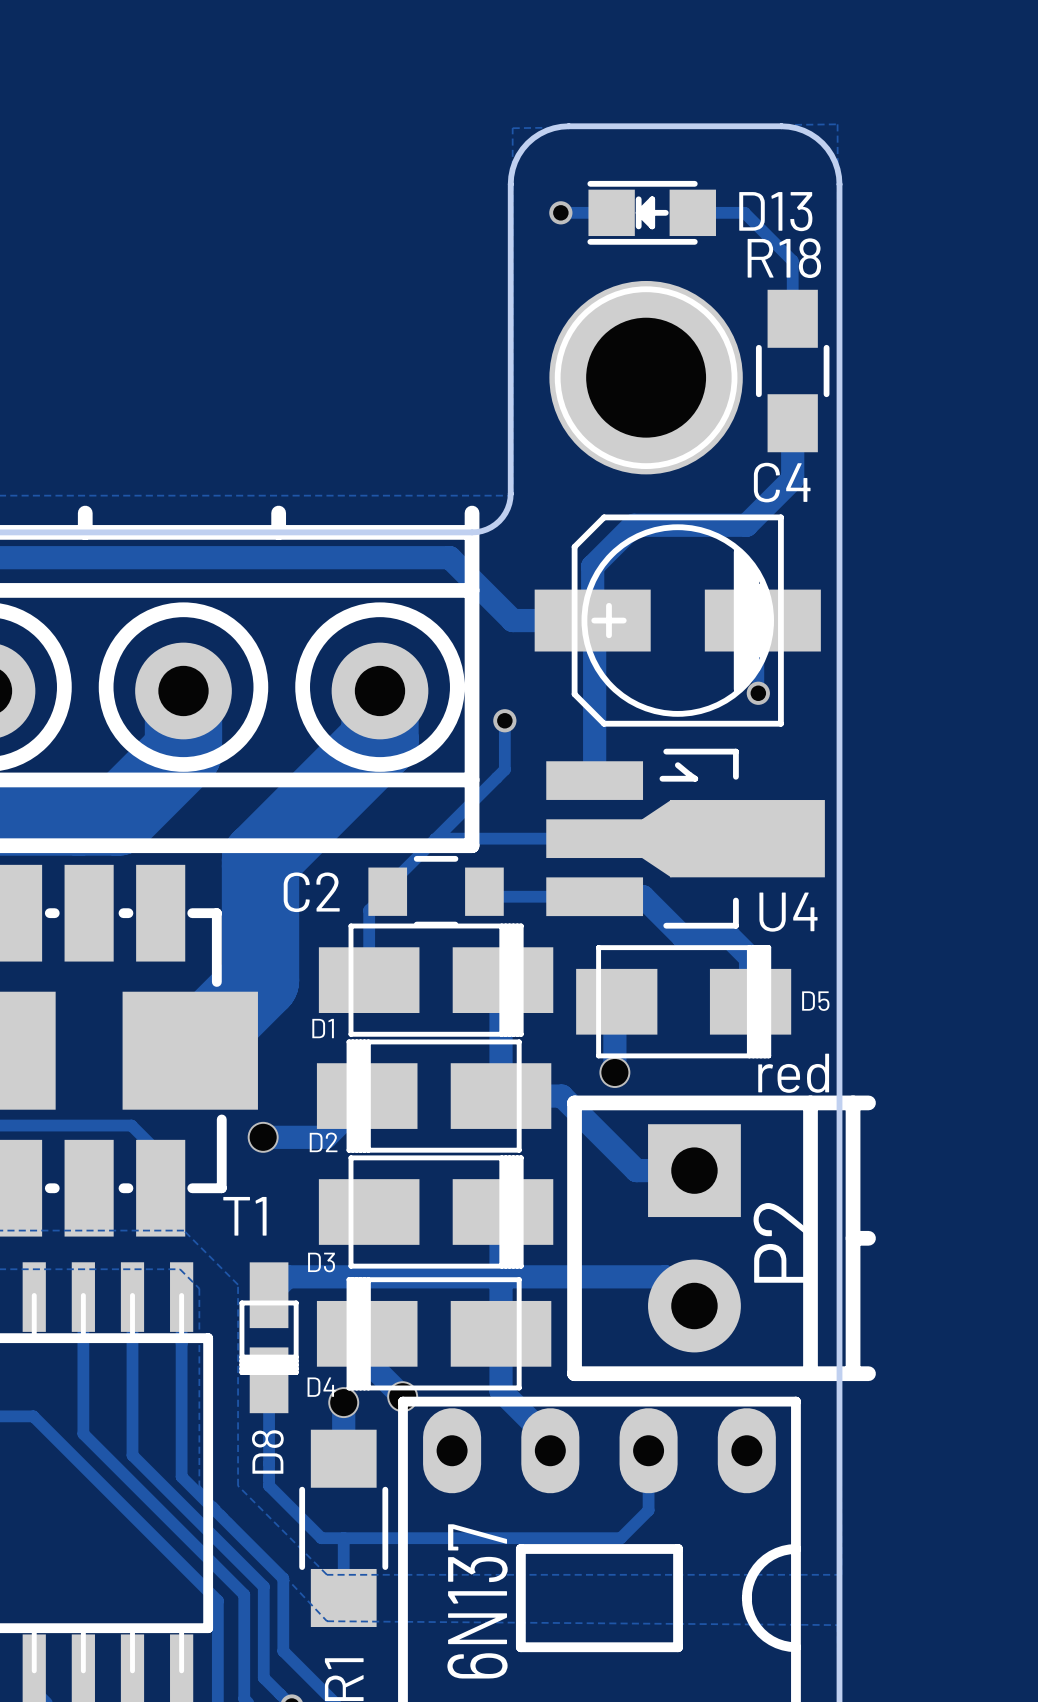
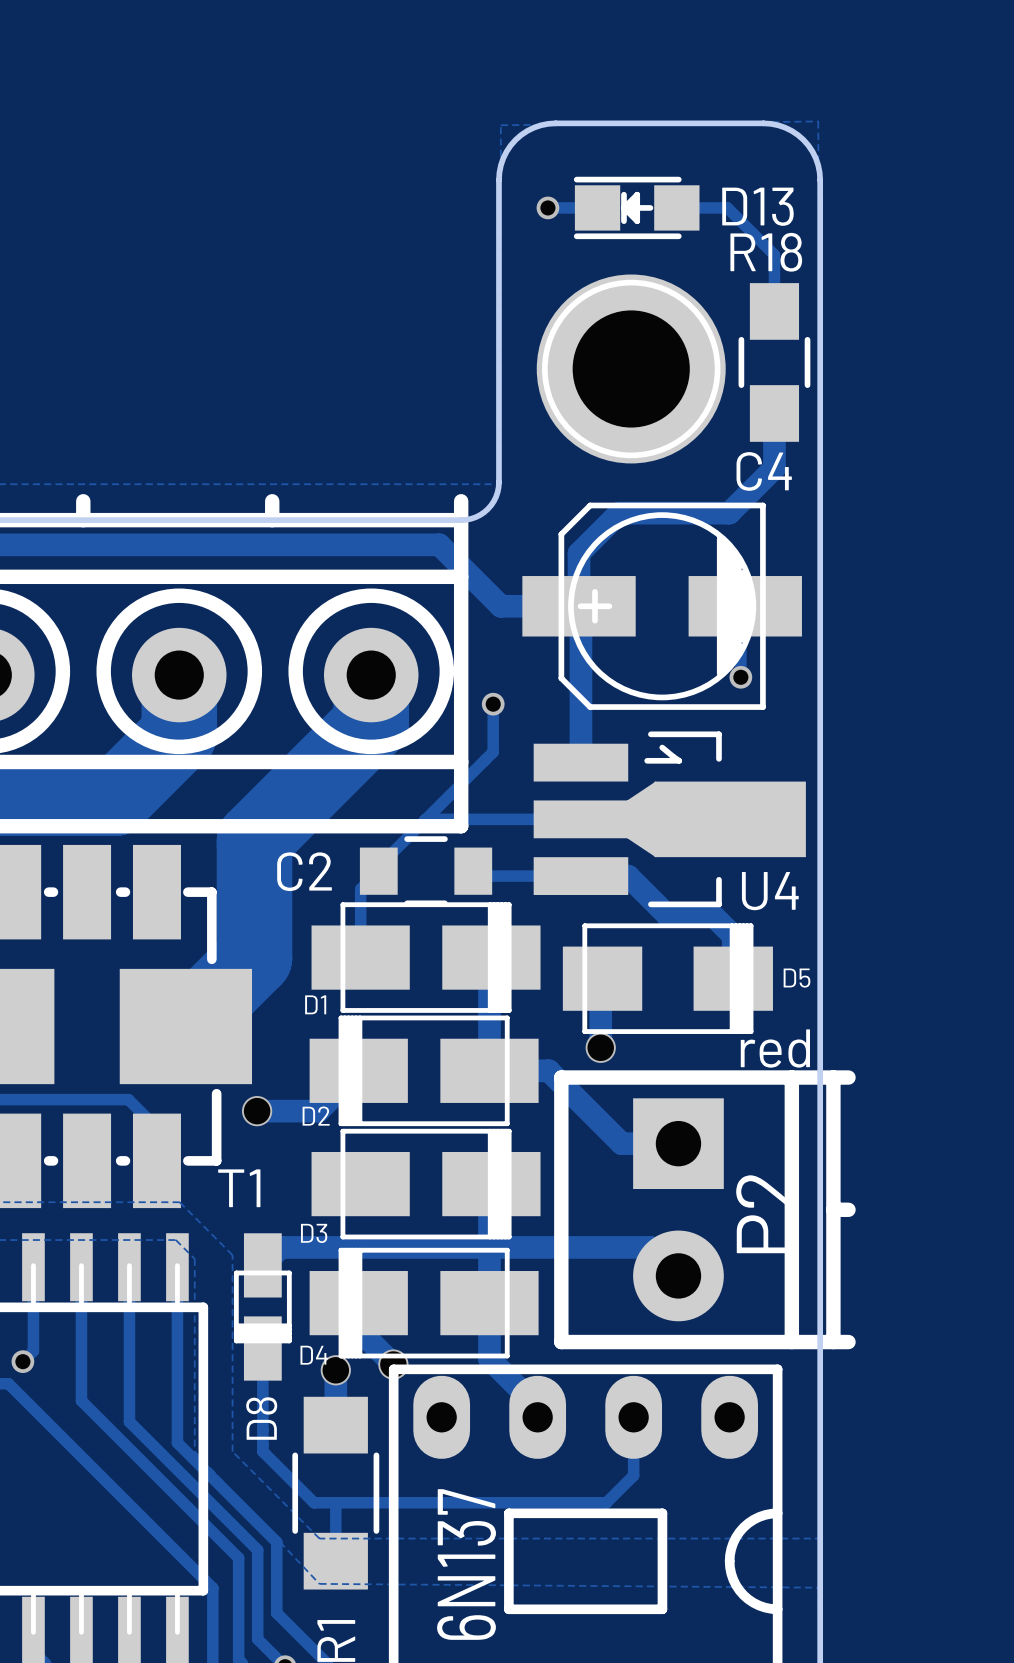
track: none -> (33, 1267) (33, 1351) (22, 1361)
via: none -> (22, 1361)
track: (8, 1416) (33, 1416) (217, 1600) (217, 1625) -> (8, 1383) (212, 1588)

